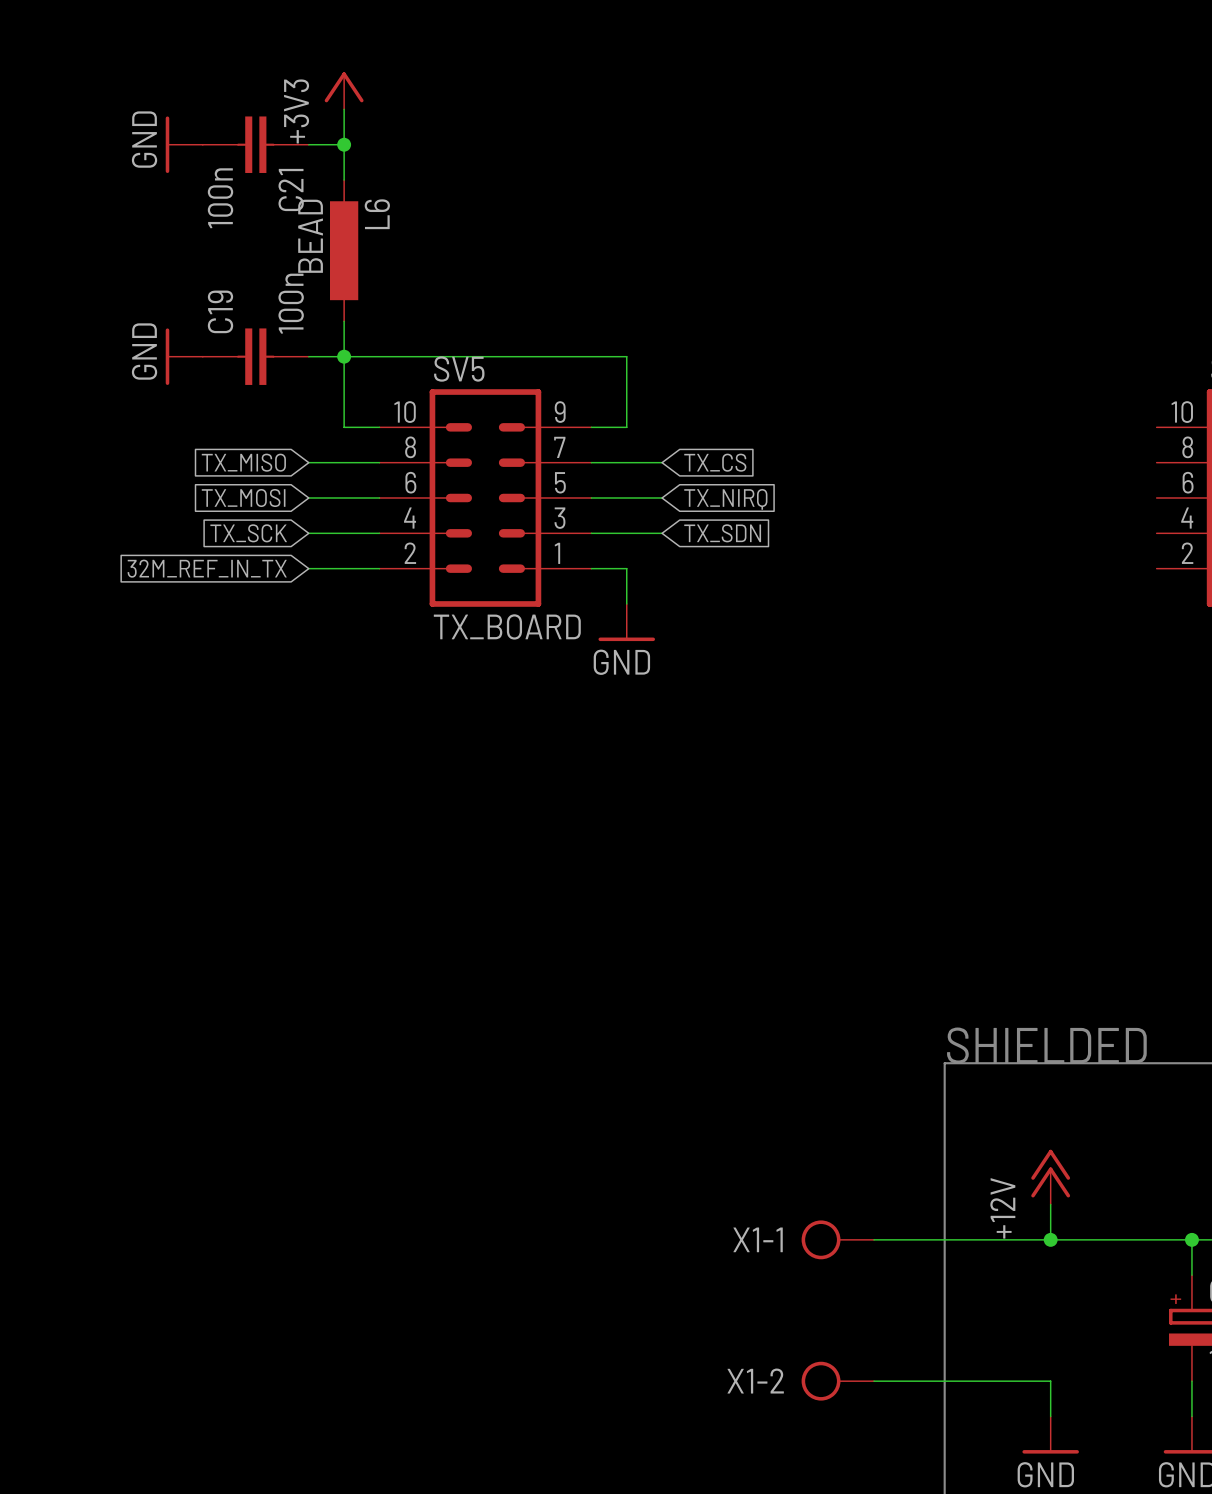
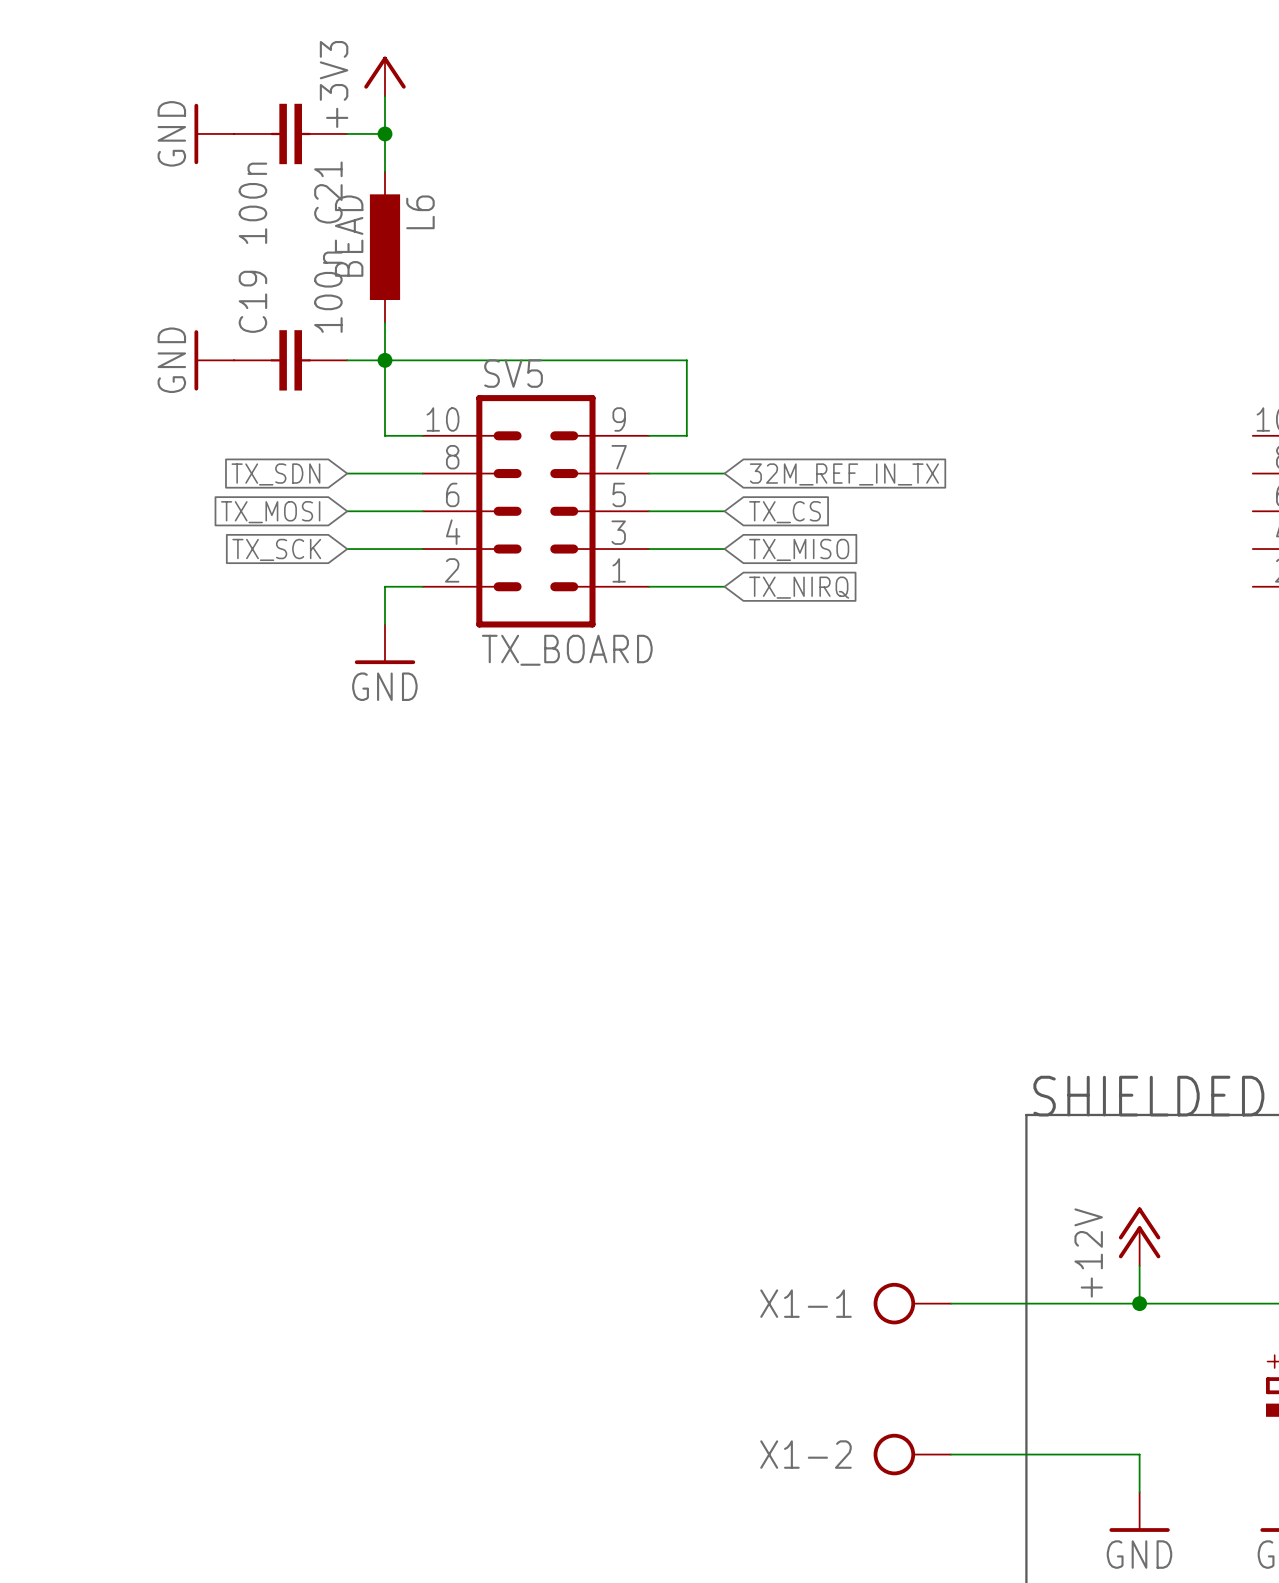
global label: TX_MISO (243, 462) -> TX_SDN (275, 474)
global label: TX_CS (715, 462) -> 32M_REF_IN_TX (844, 474)
global label: TX_NIRQ (725, 499) -> TX_CS (784, 512)
global label: TX_SDN (722, 533) -> TX_MISO (799, 549)
global label: 32M_REF_IN_TX (207, 568) -> none
wire: (308, 568) (344, 568) -> (384, 624) (384, 586)
wire: (626, 568) (626, 603) -> (686, 586) (724, 586)
global label: none -> TX_NIRQ (799, 587)
power symbol position: GND (626, 622) -> GND (384, 644)

